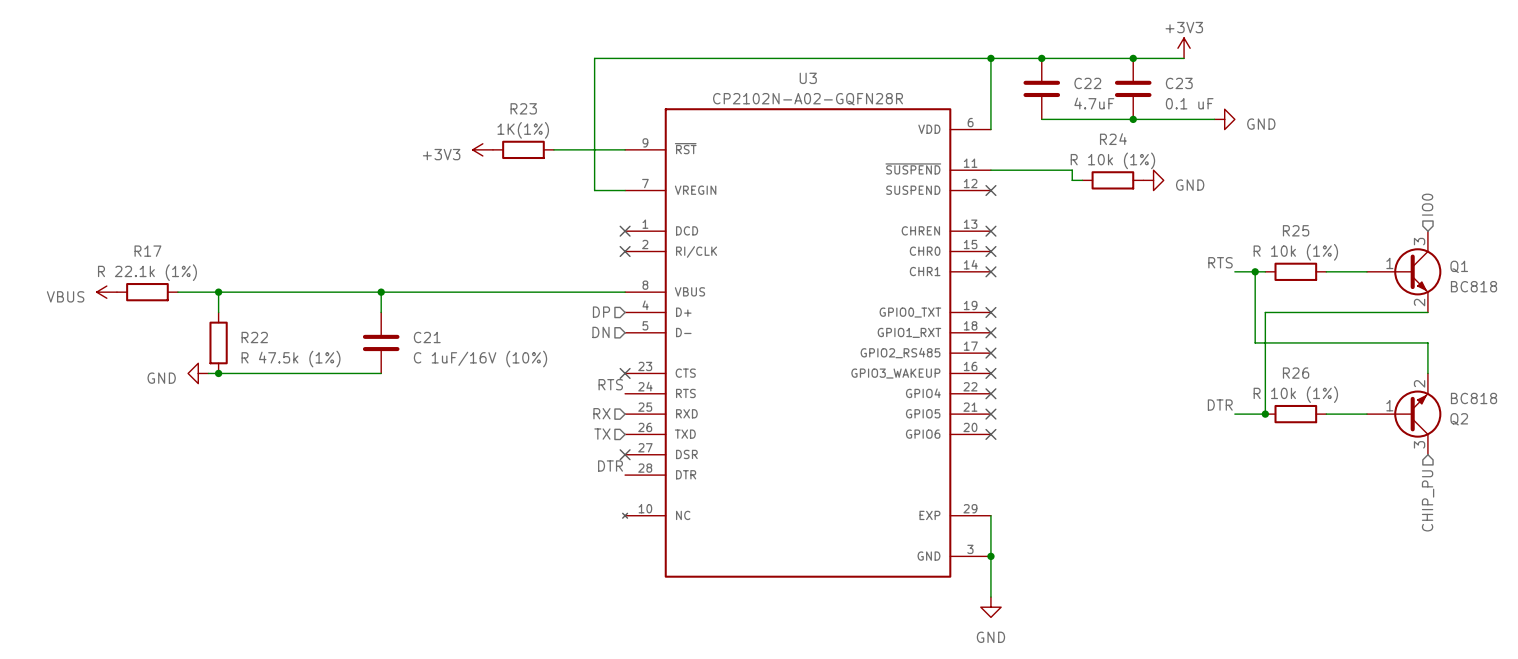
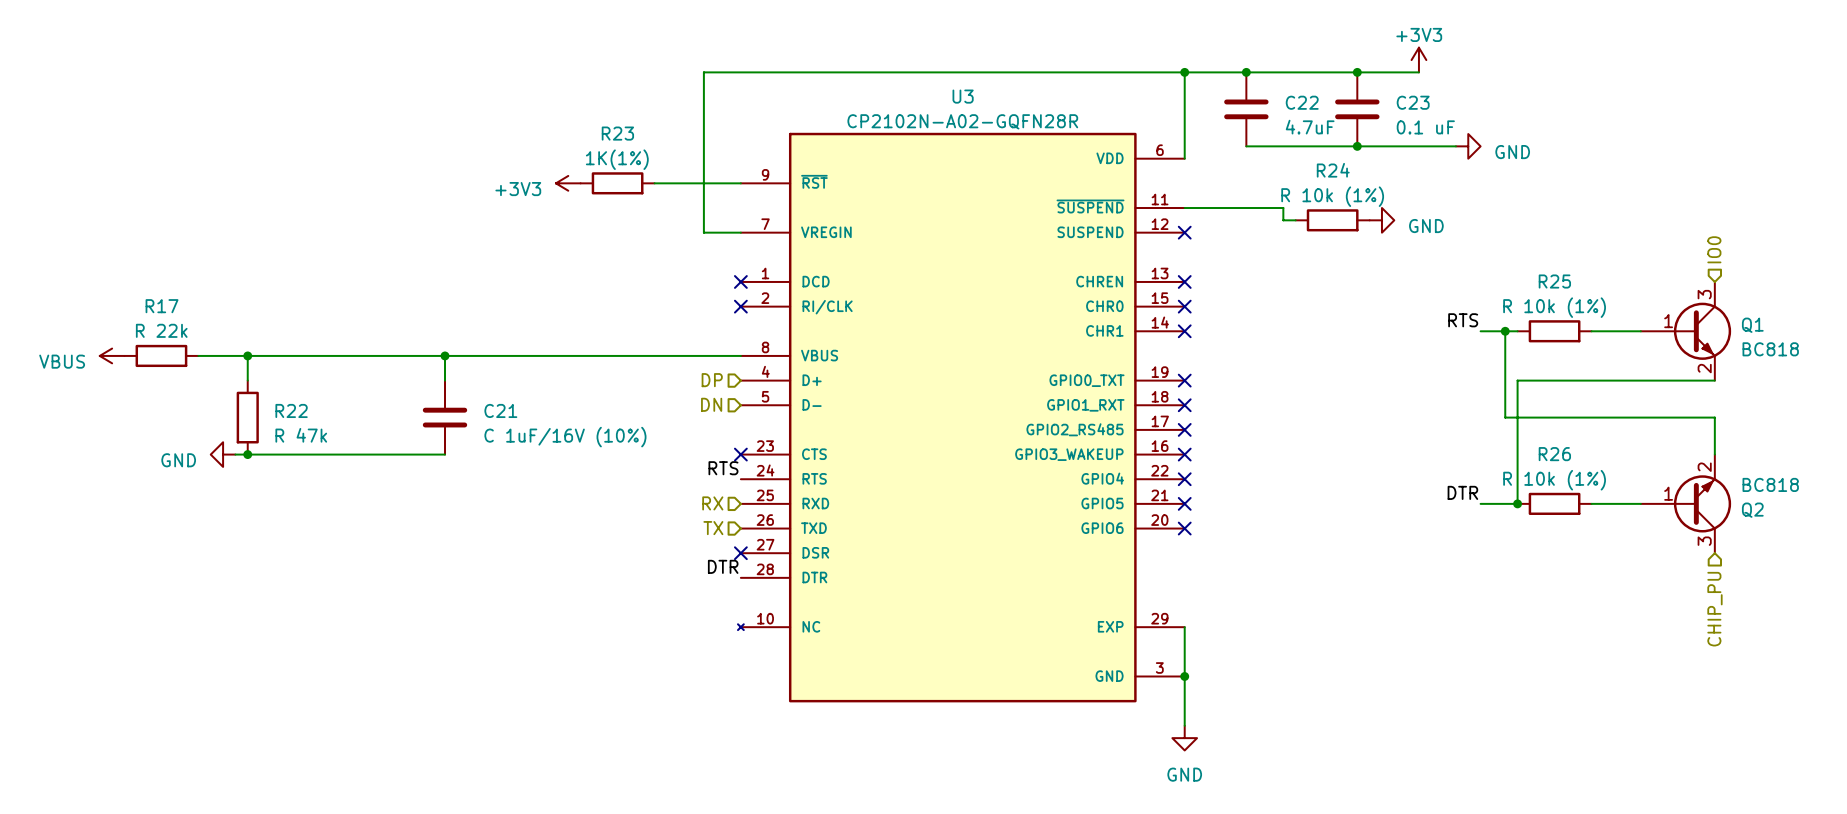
R17 value: R 22.1k (1%) (147, 272) -> R 22k (161, 330)
R22 value: R 47.5k (1%) (291, 359) -> R 47k (301, 435)

